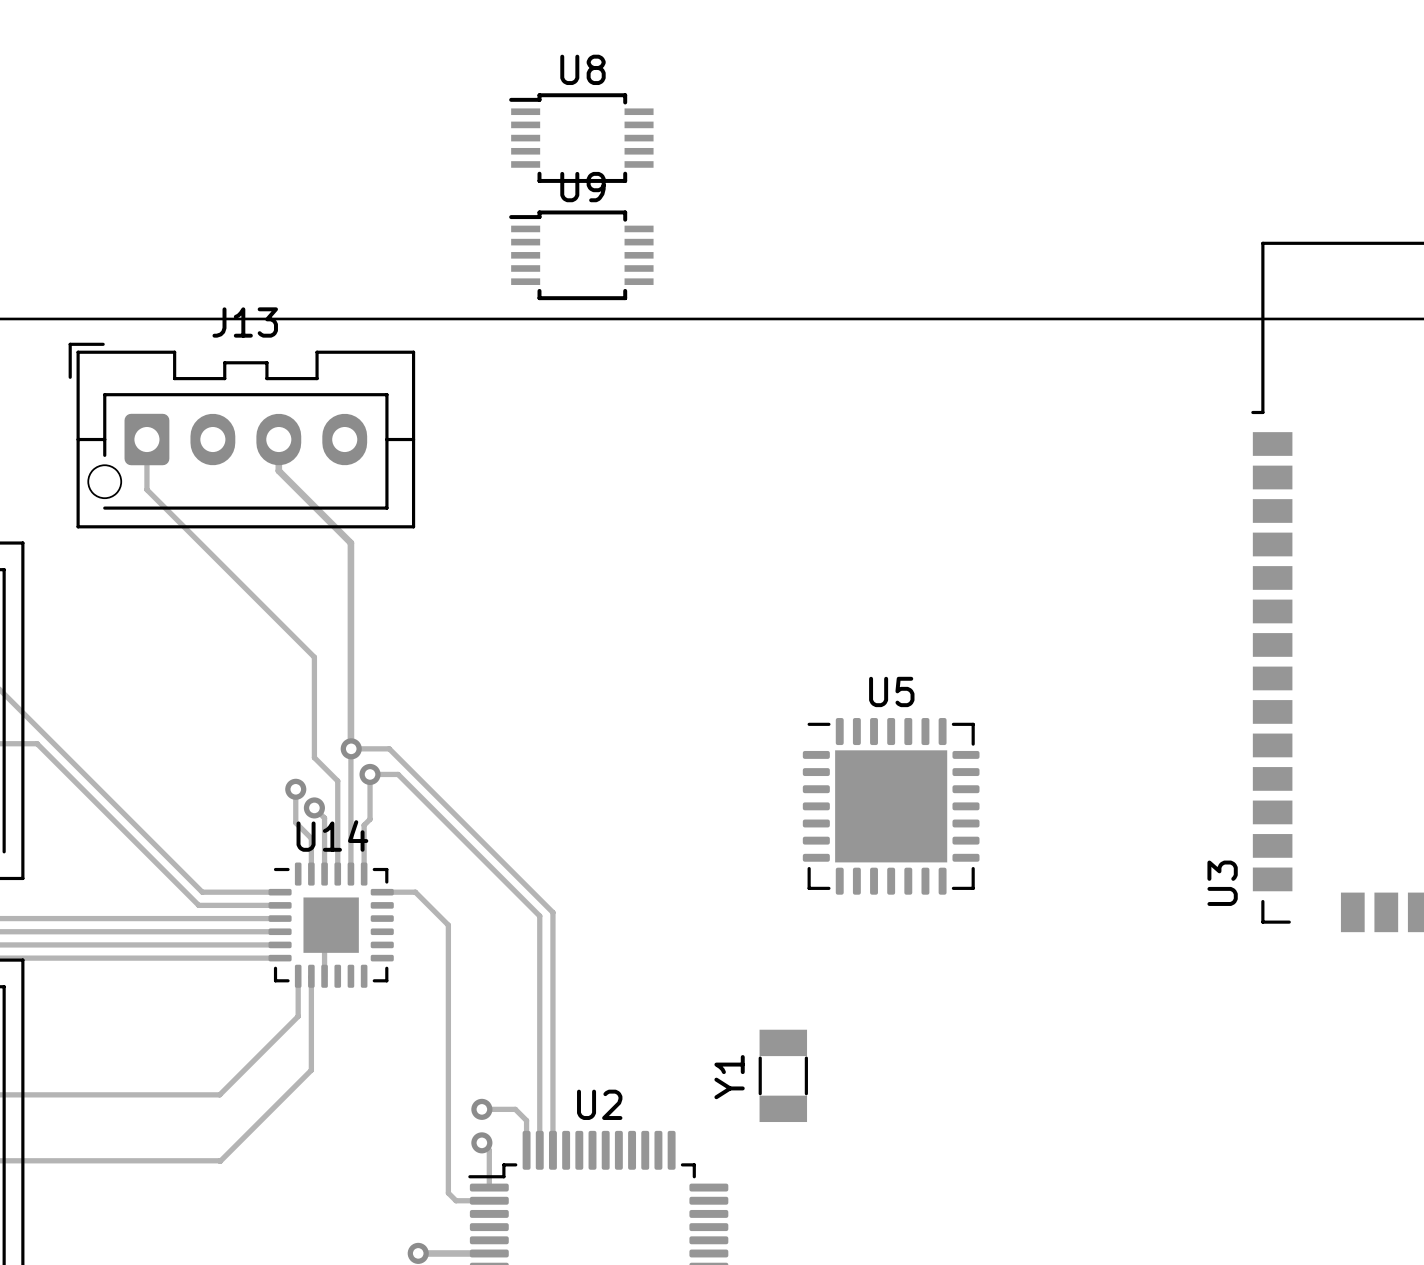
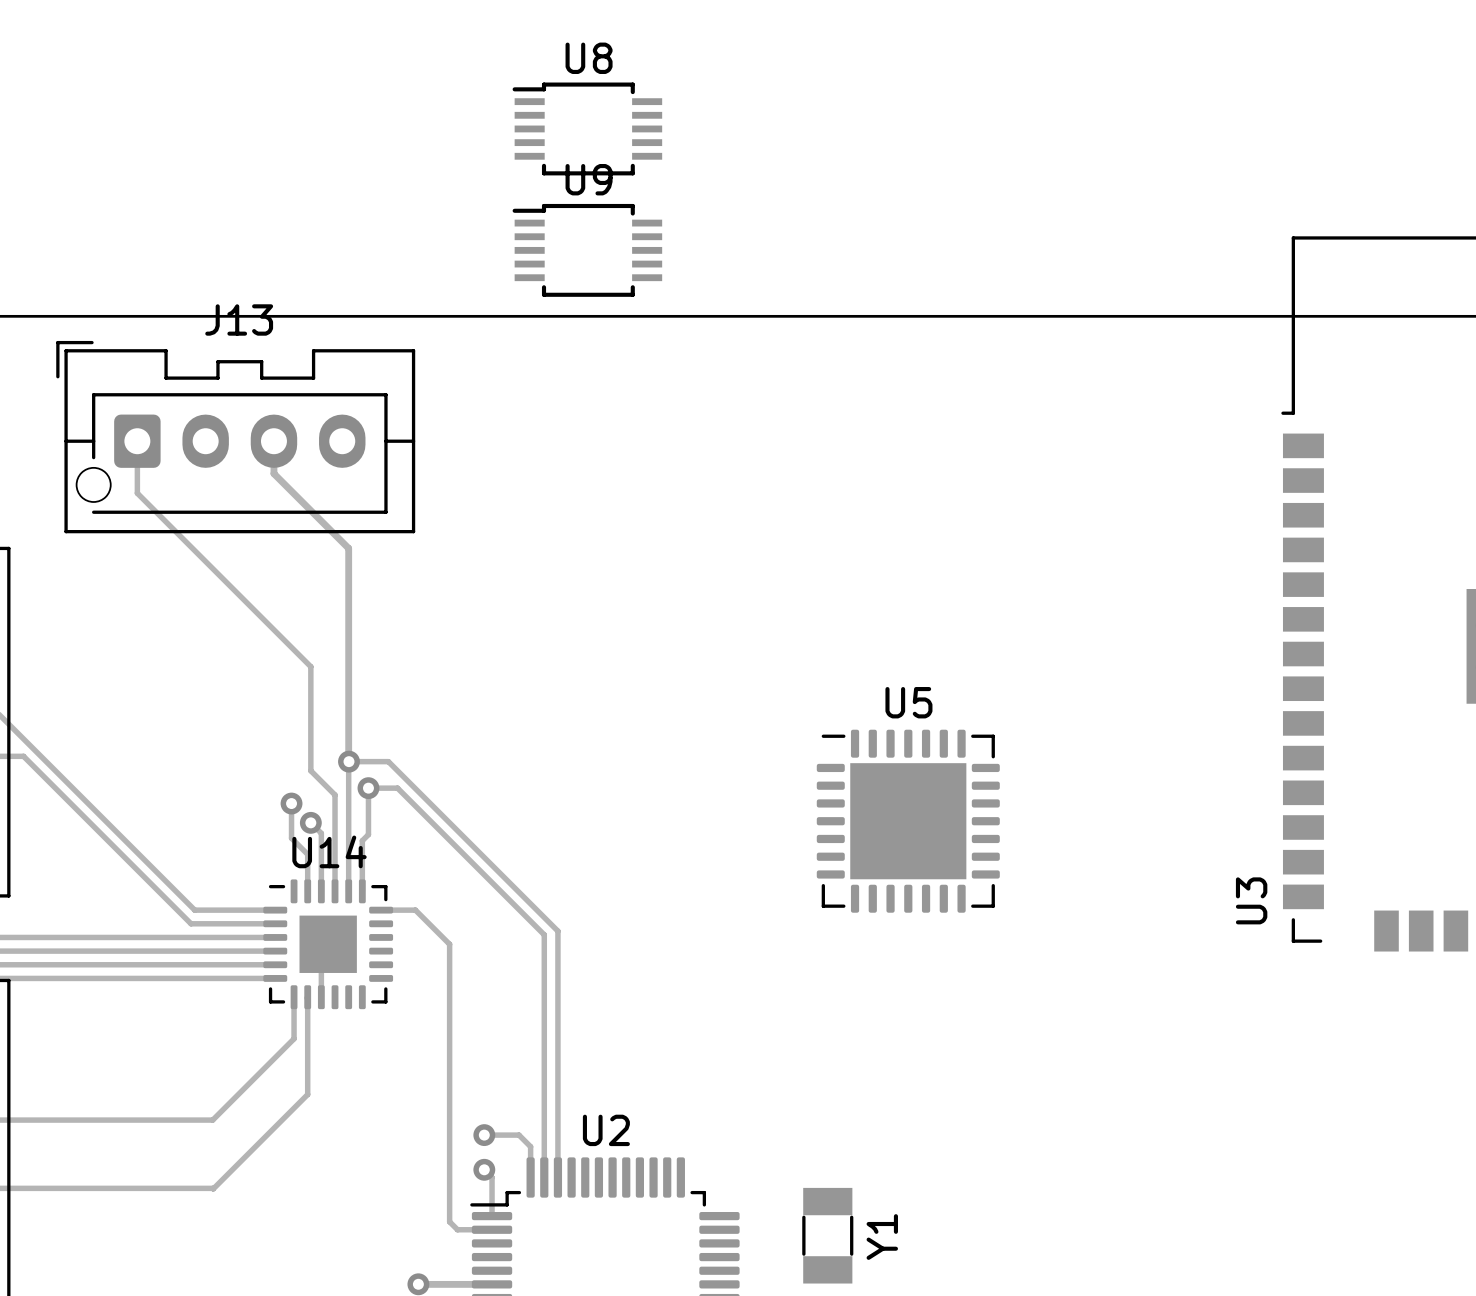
Y1 position: (783, 1075) -> (827, 1235)
Y1 name position: Y1 (729, 1077) -> Y1 (882, 1237)

